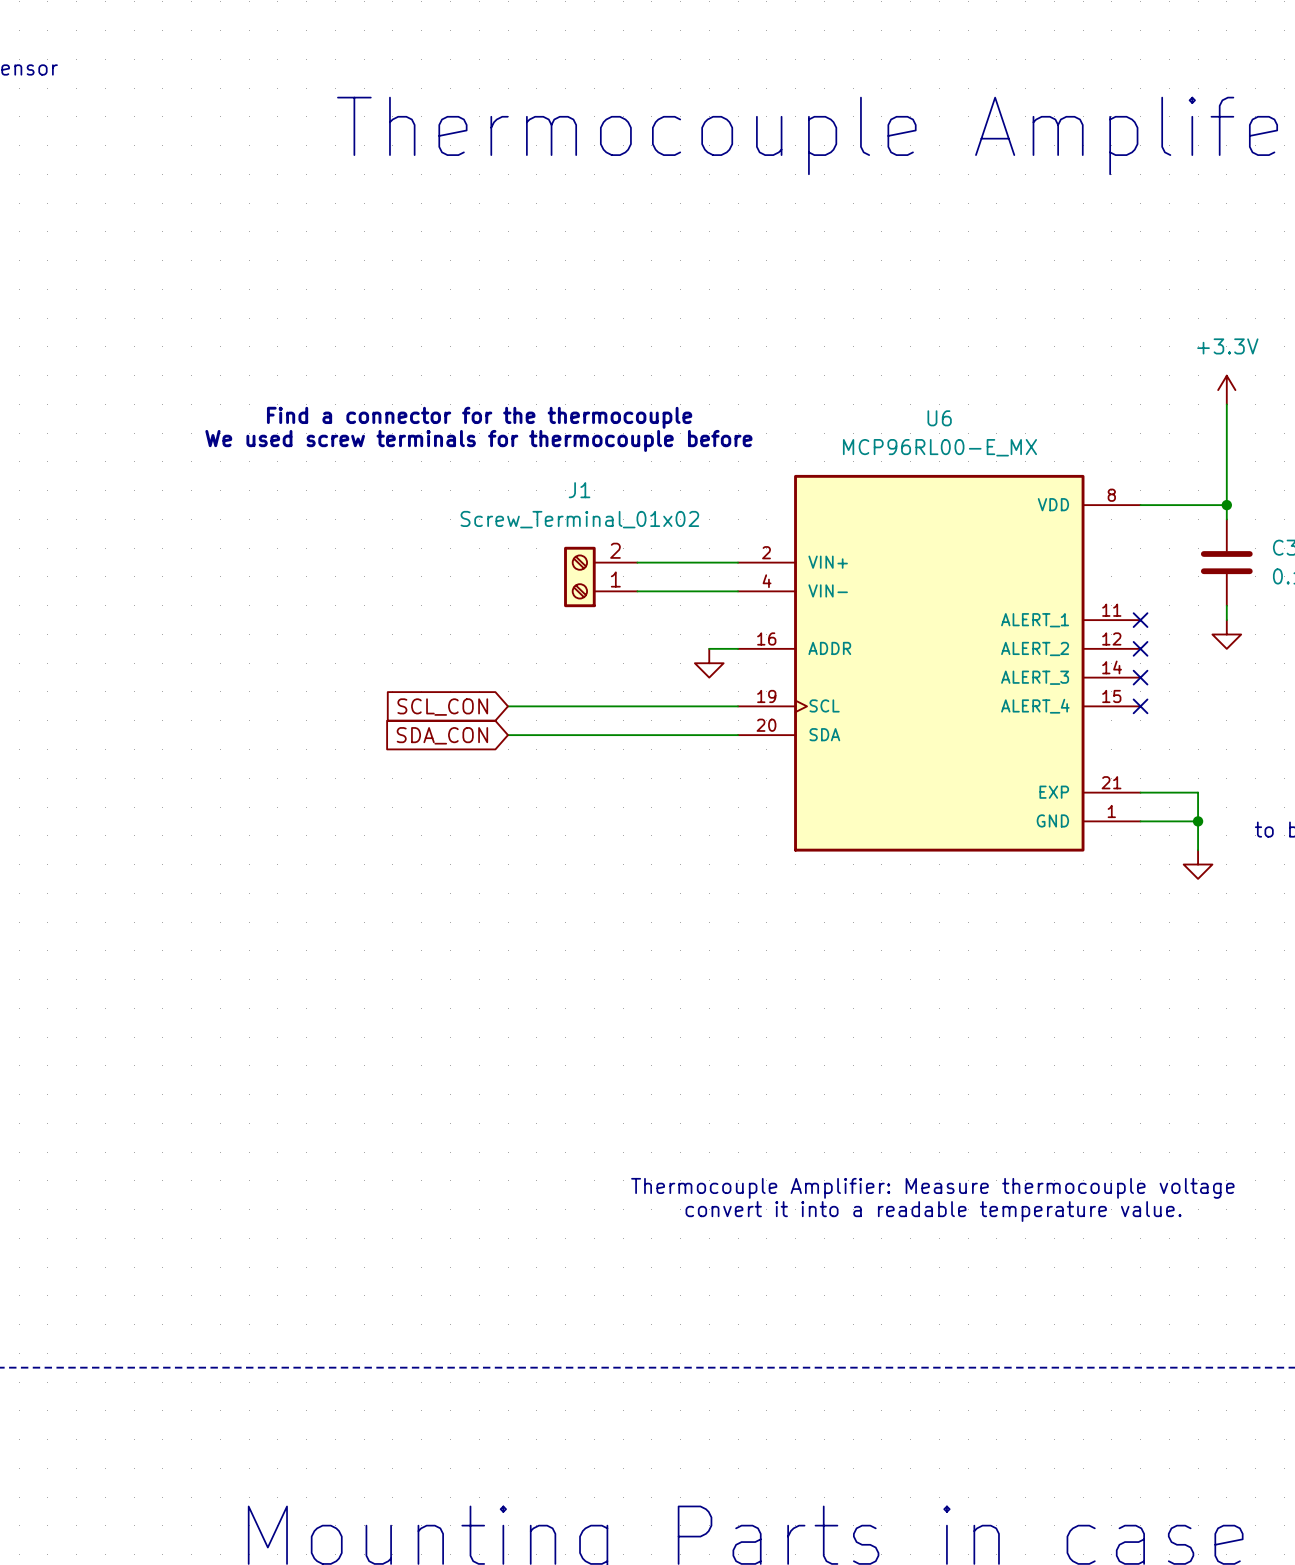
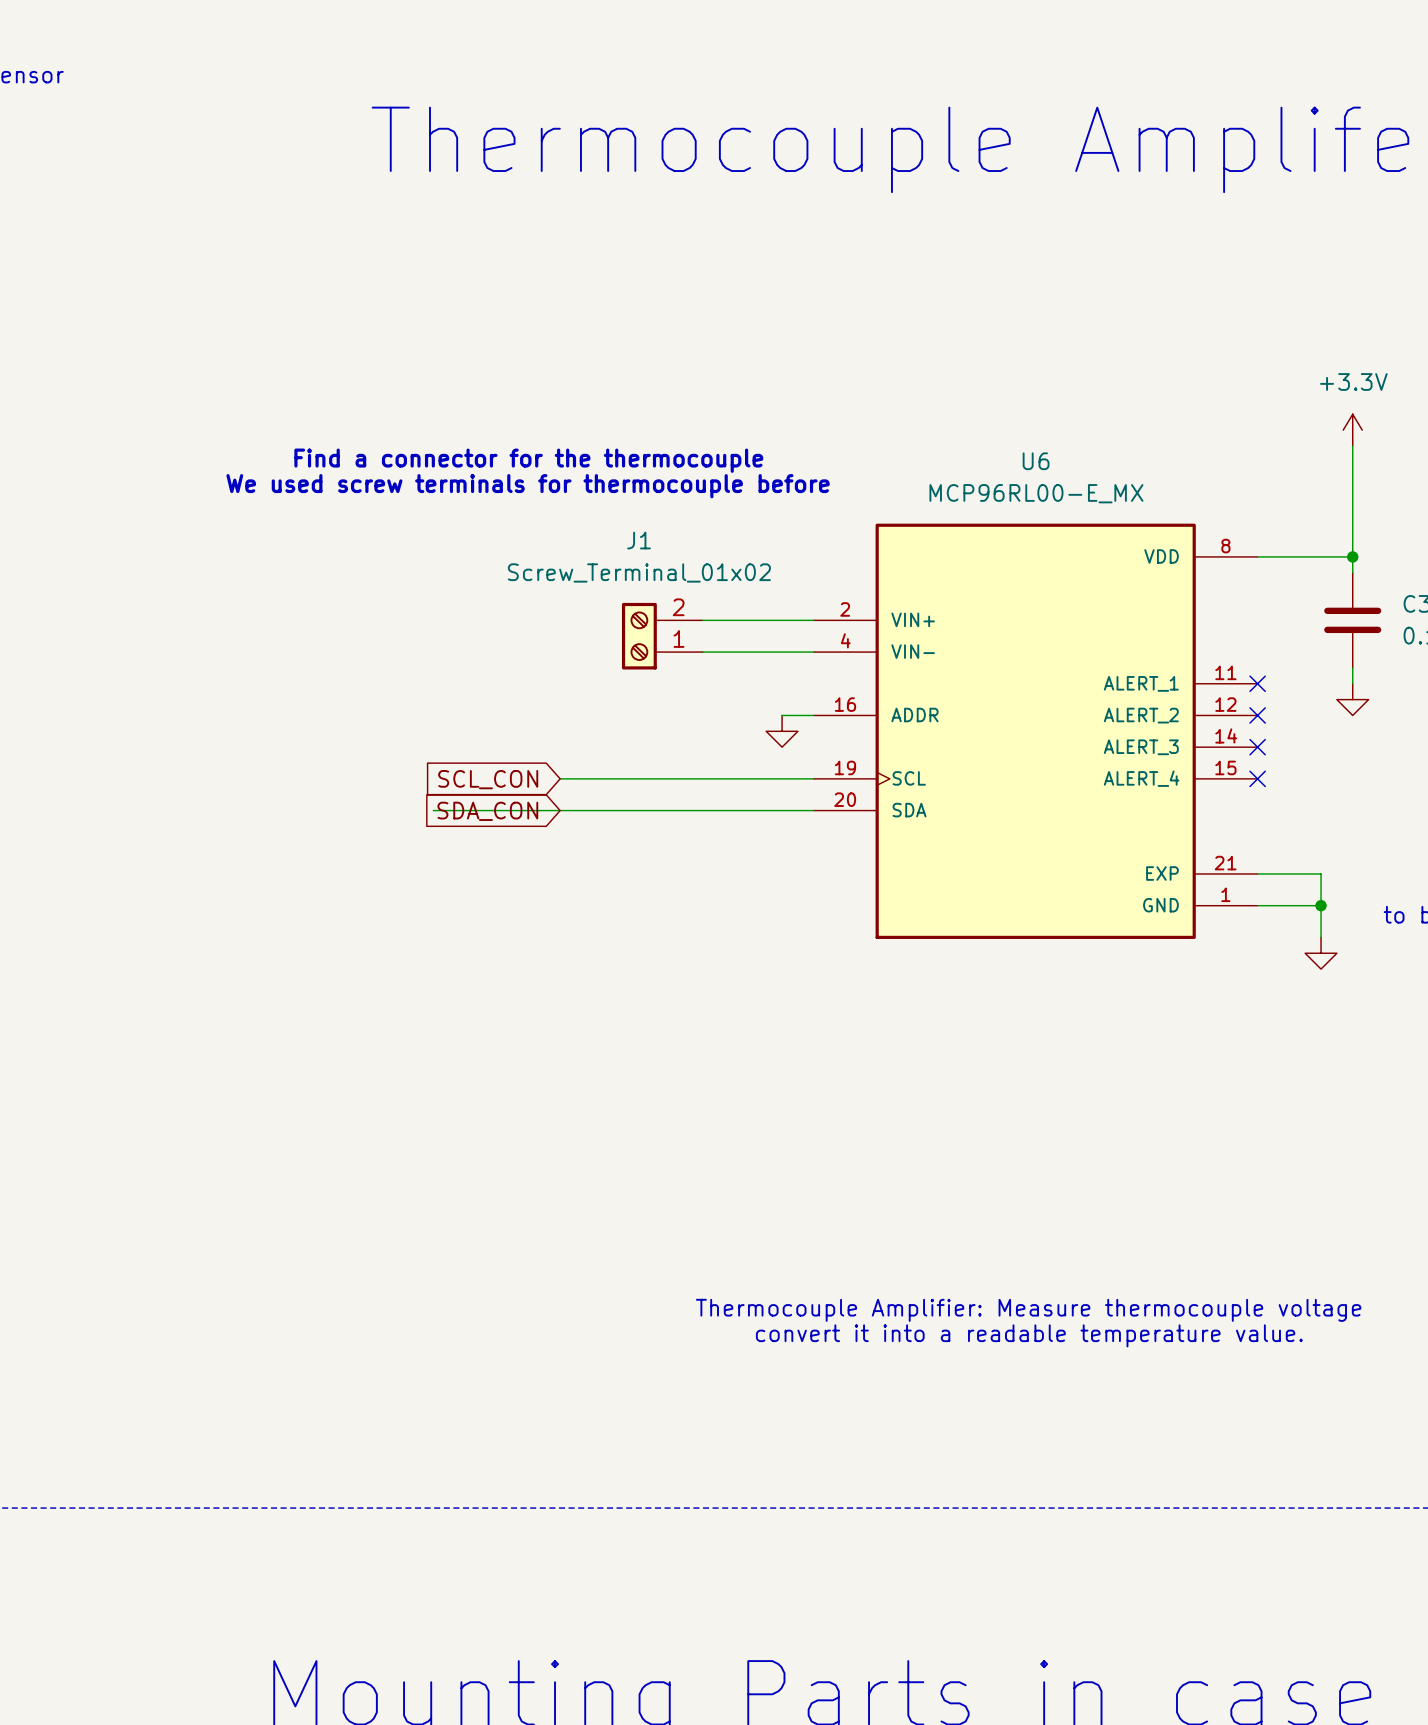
wire: none -> (433, 810) (560, 810)

